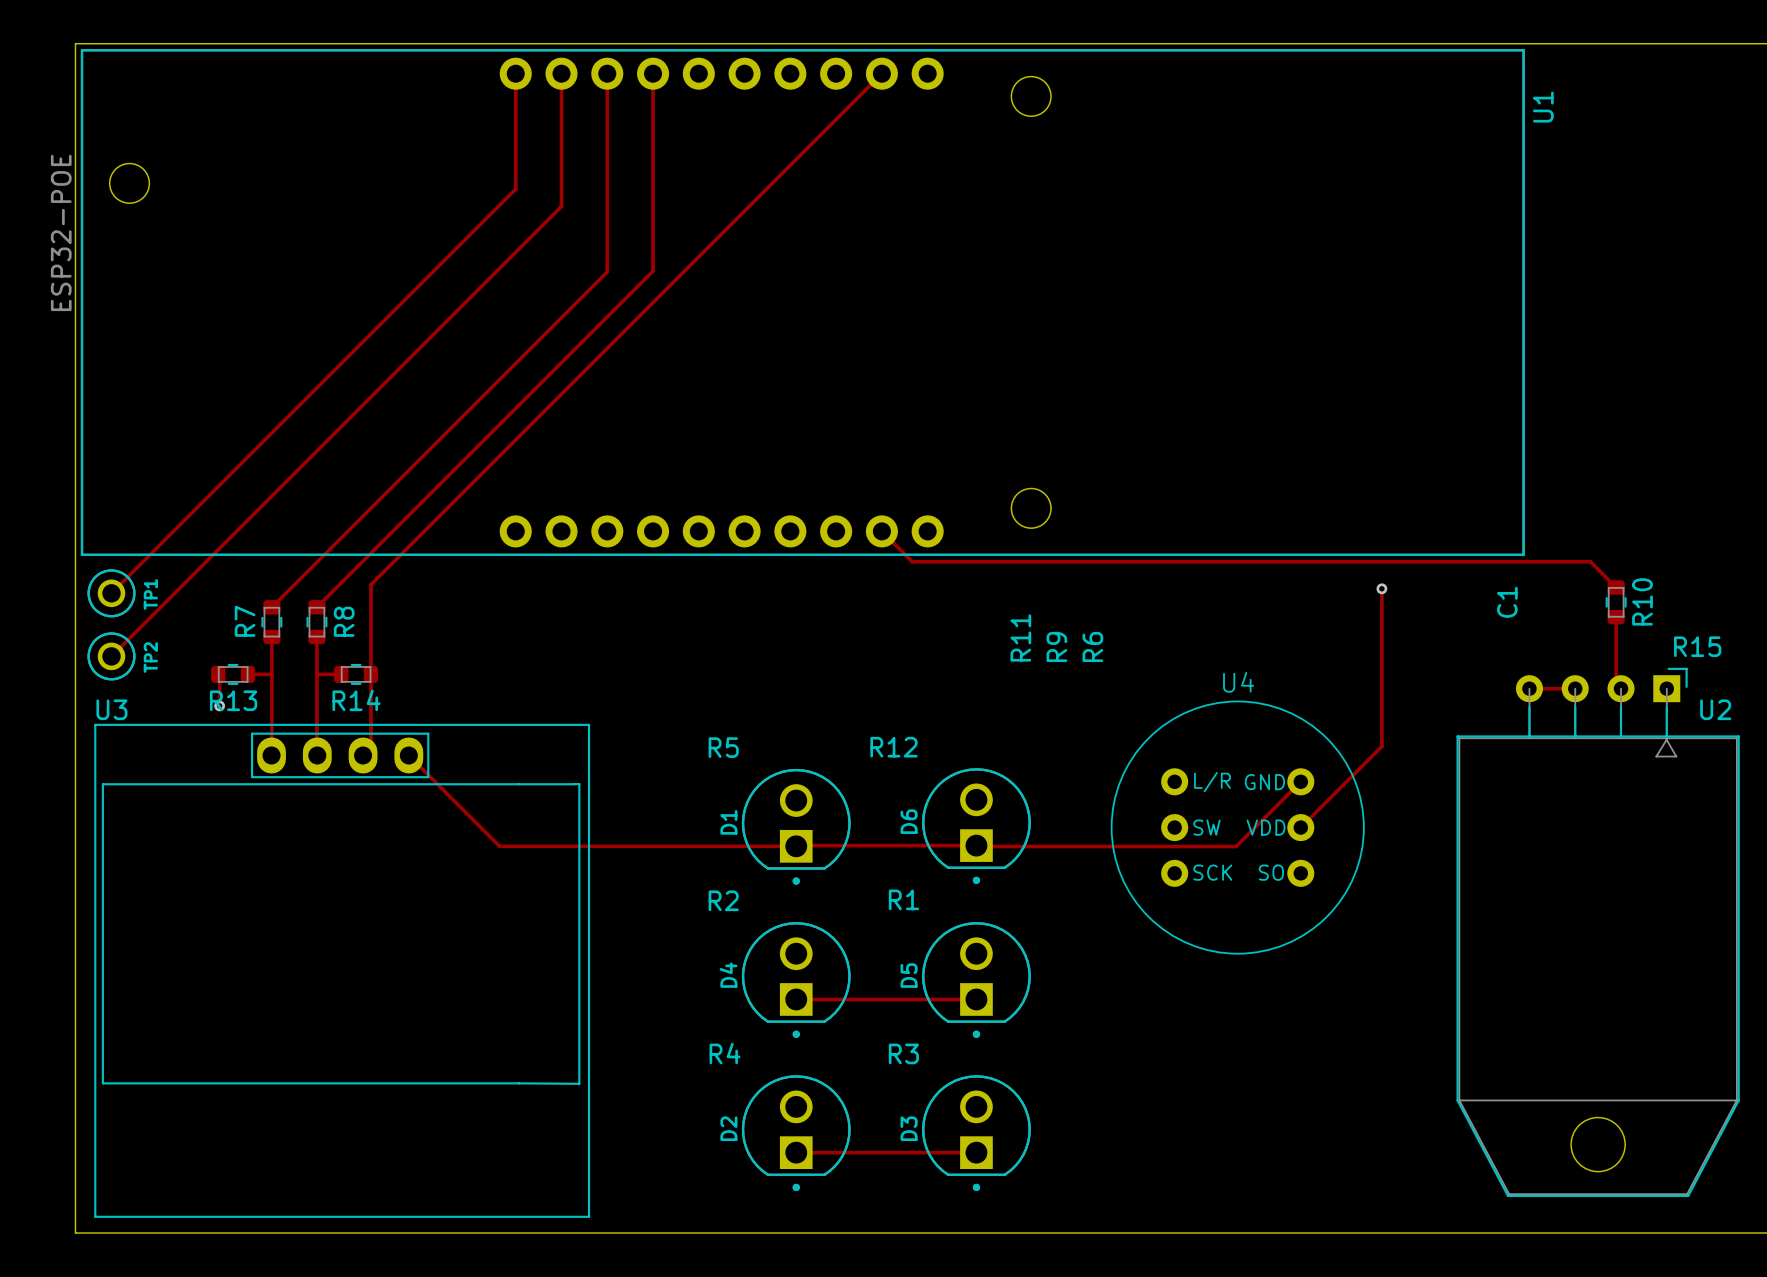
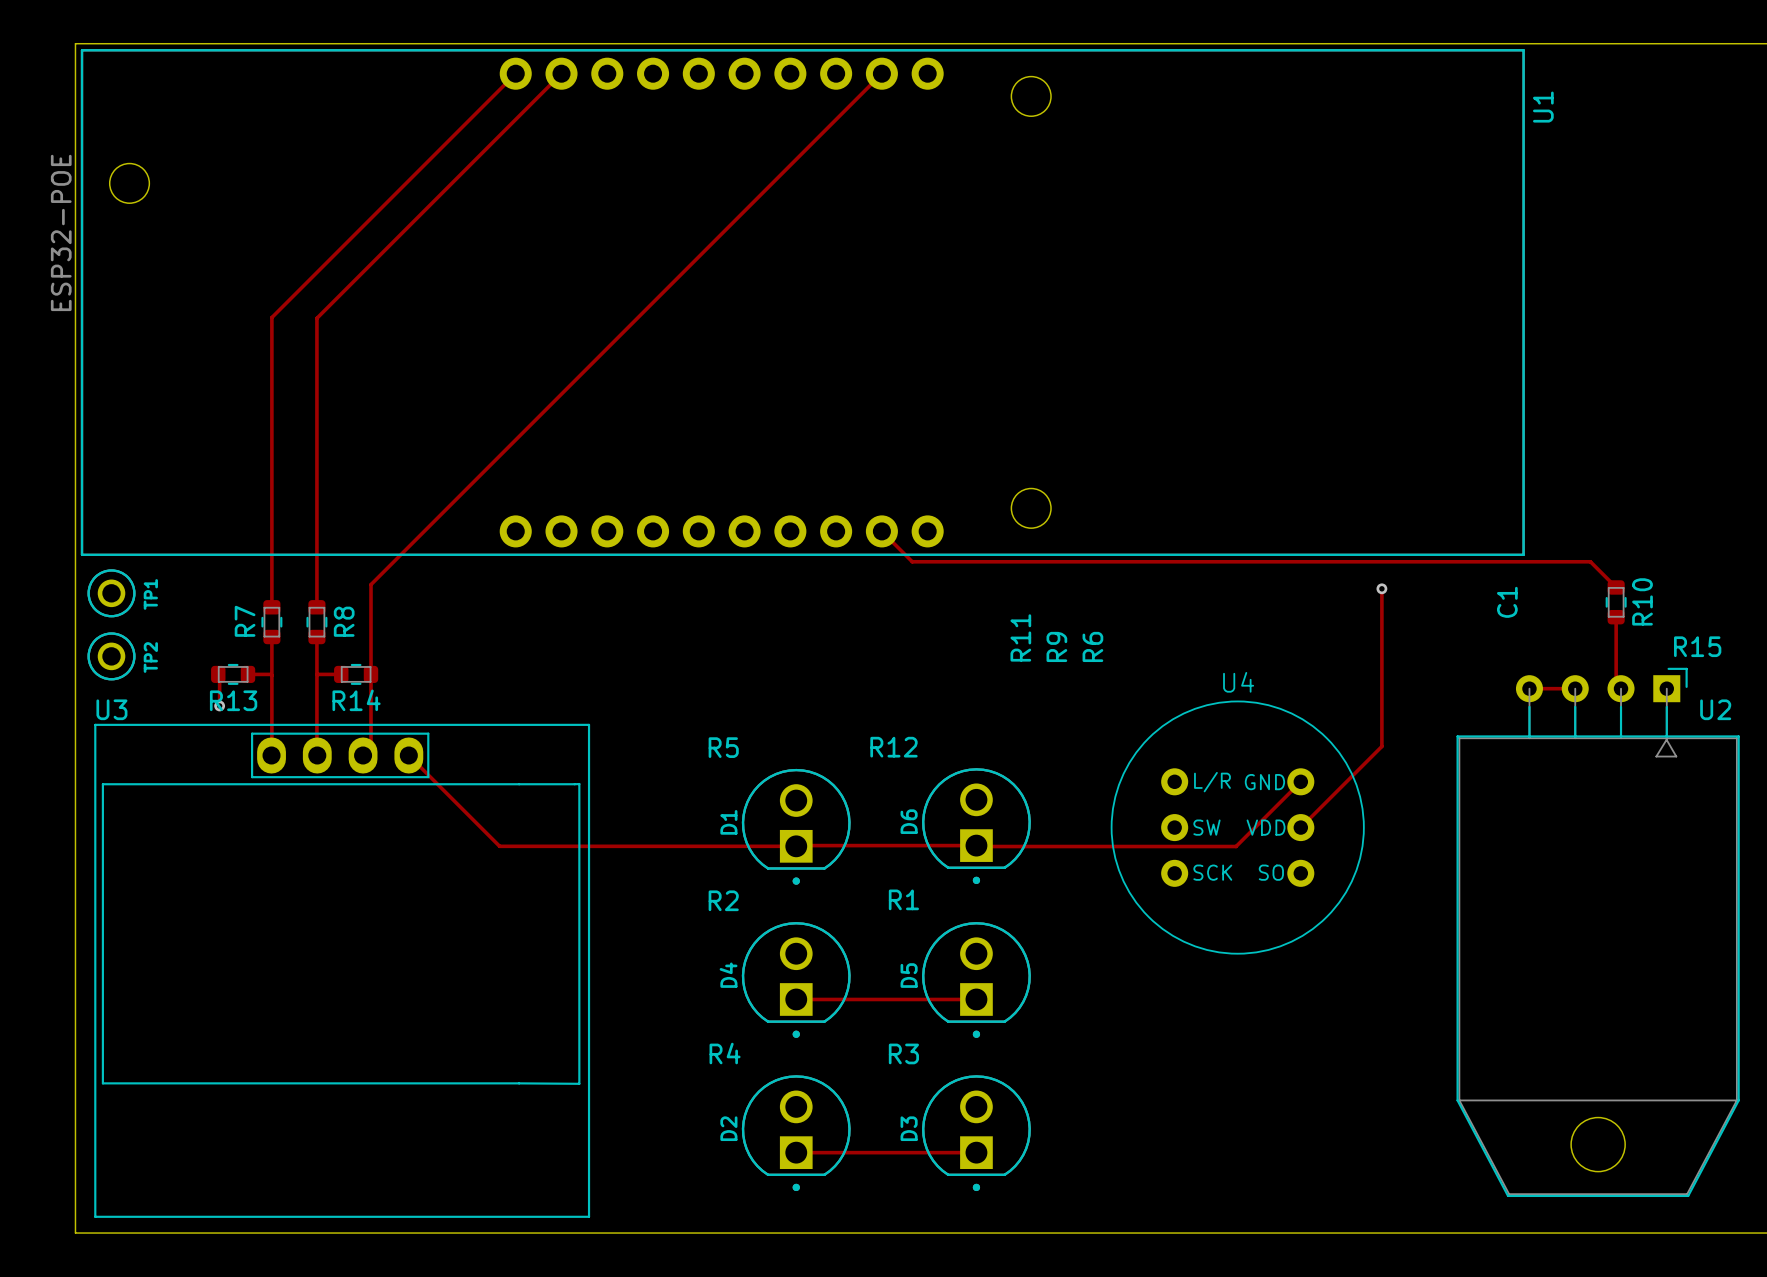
track: (515, 73) (515, 189) (111, 593) -> none
track: (561, 73) (561, 206) (111, 656) -> none
track: (607, 73) (607, 271) (271, 607) -> (515, 73) (271, 317) (271, 607)
track: (653, 73) (653, 271) (316, 607) -> (561, 73) (316, 318) (316, 607)

